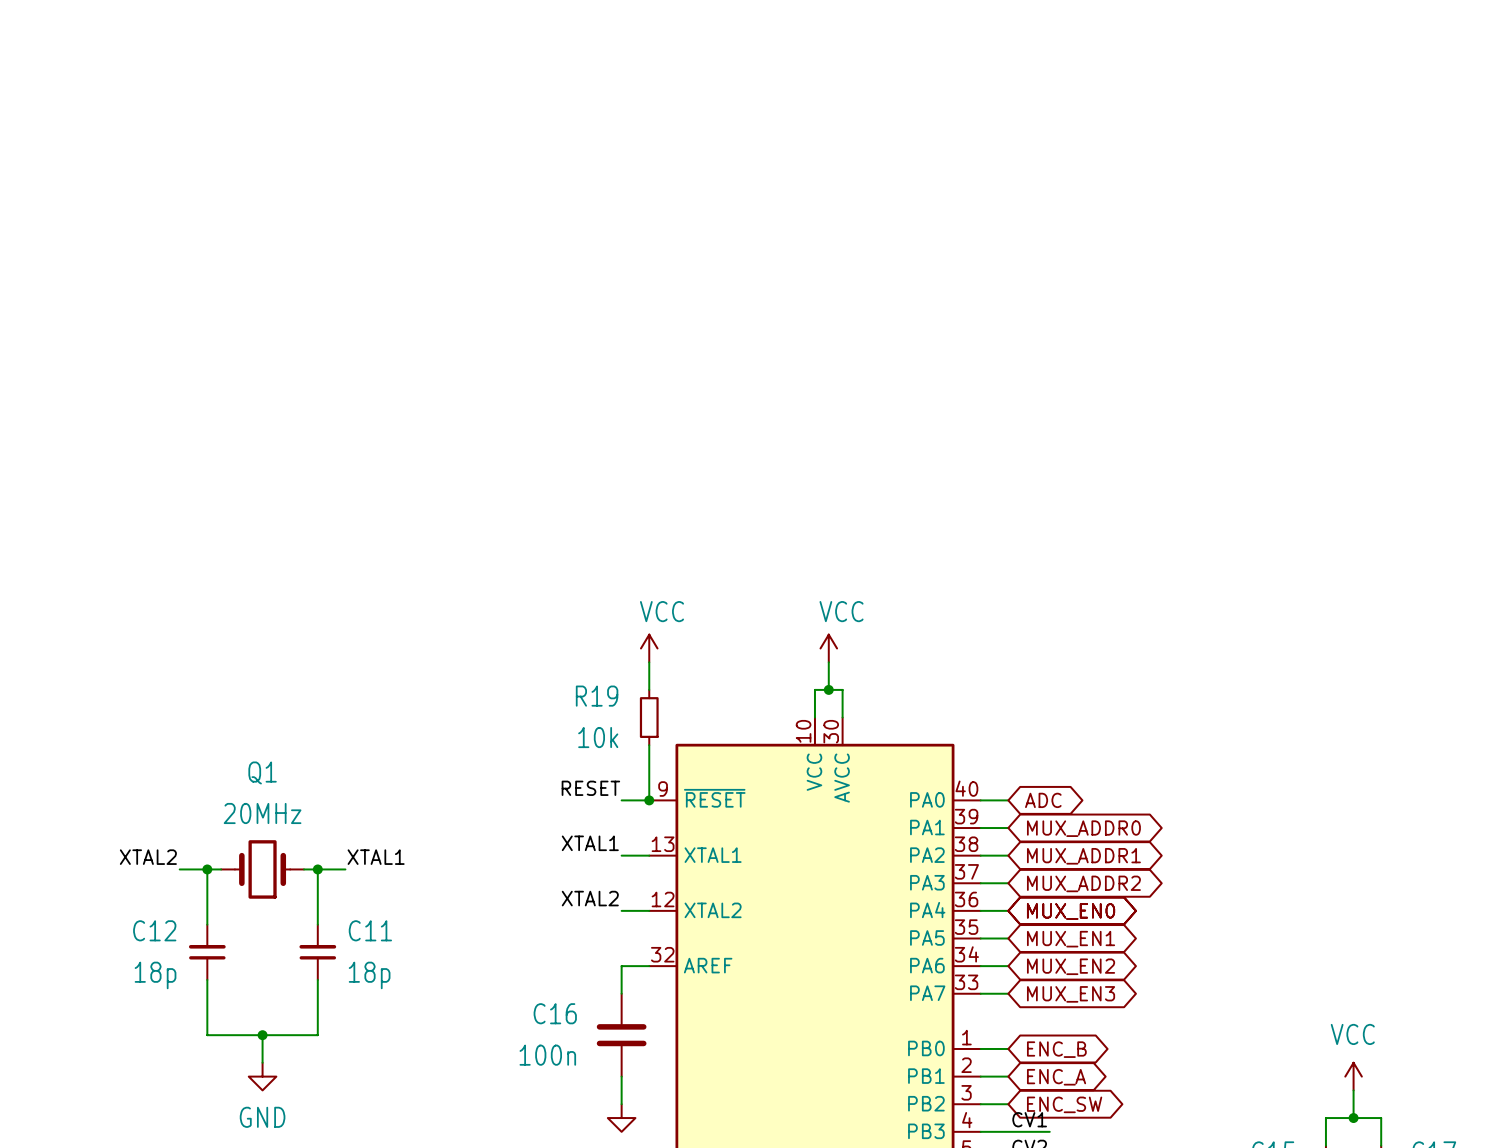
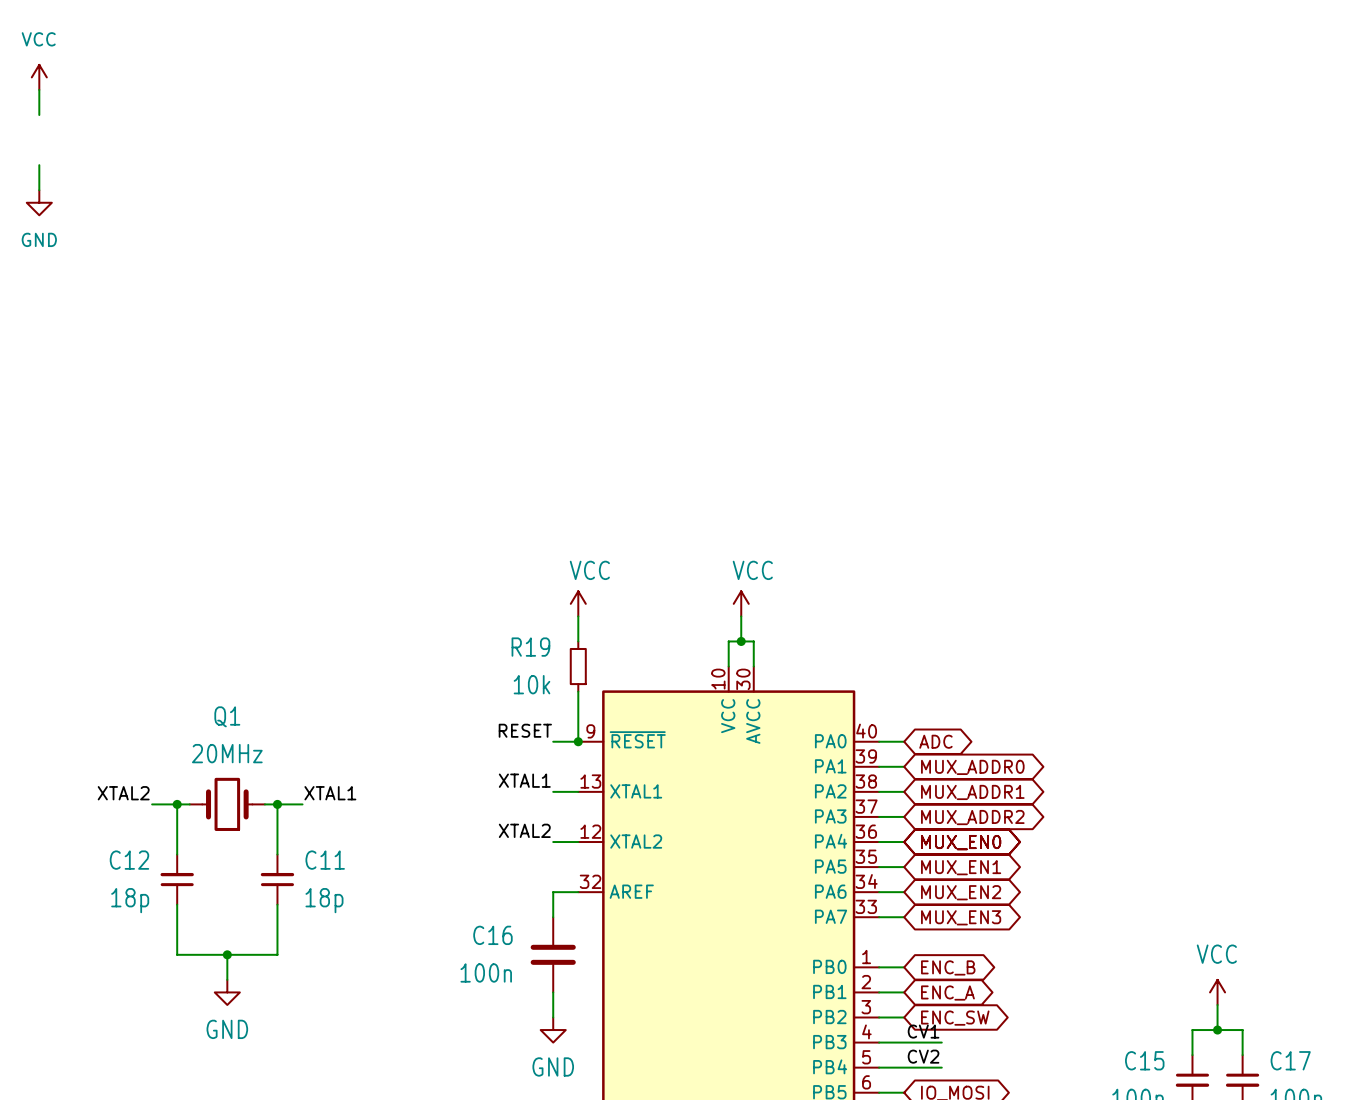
power symbol: none -> VCC (39, 77)
wire: none -> (39, 89) (39, 115)
wire: none -> (39, 165) (39, 190)
power symbol: none -> GND (39, 202)

